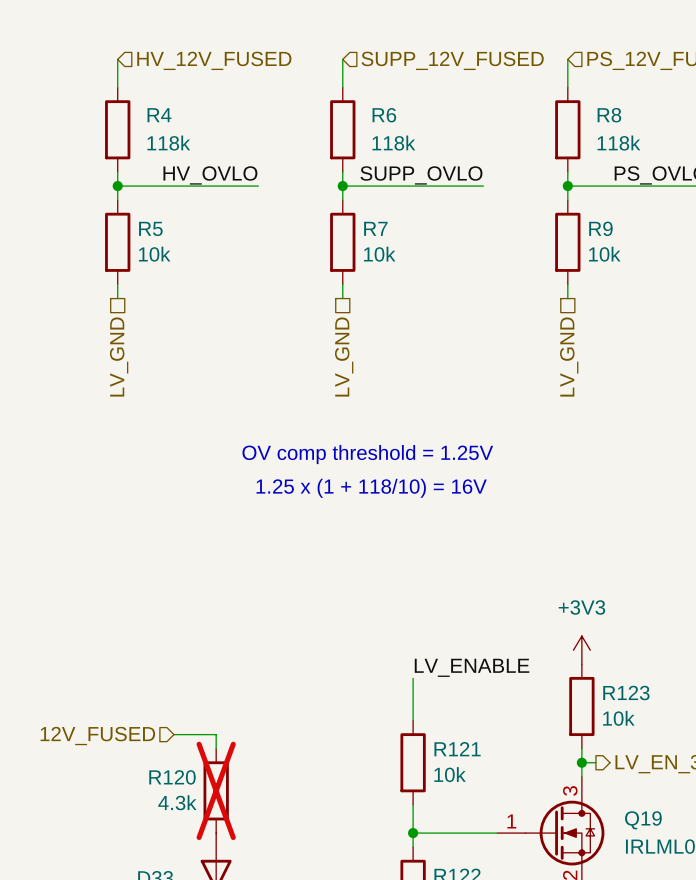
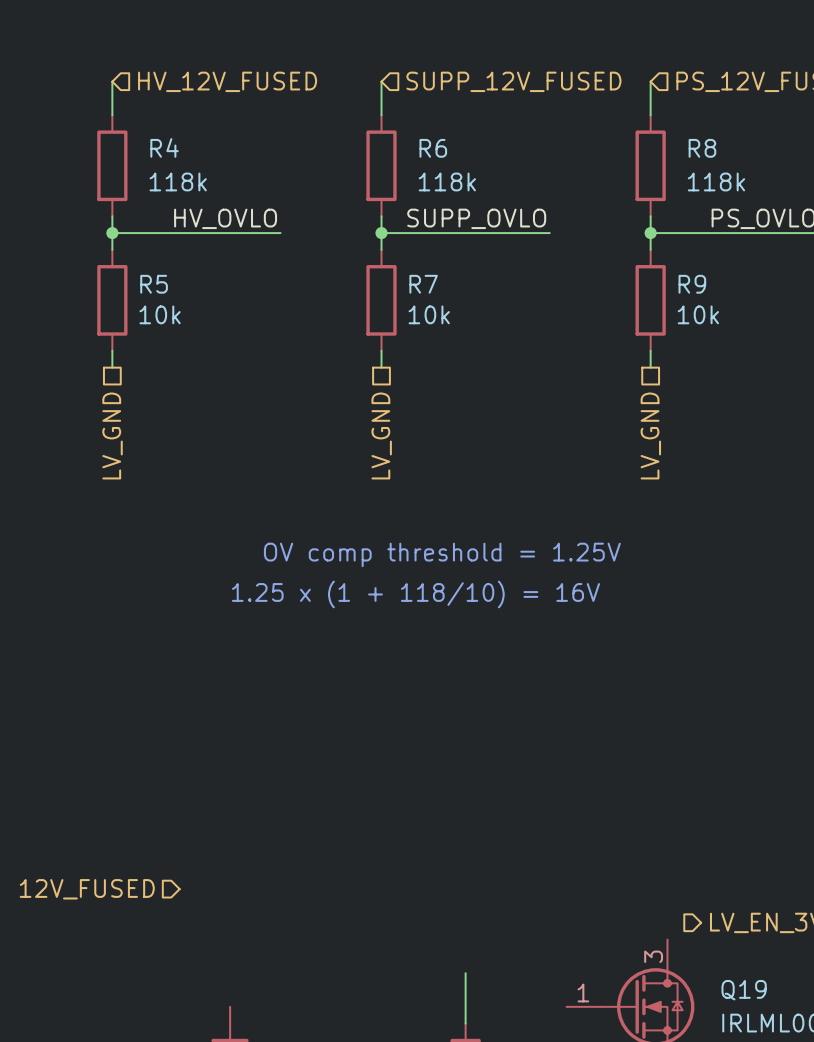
power symbol: +3V3 (581, 650) -> none
label: LV_ENABLE (472, 667) -> none
wire: (413, 678) (413, 720) -> none
R123: 10k (581, 706) -> none
wire: (173, 734) (216, 734) (216, 748) -> none
wire: (581, 748) (581, 776) -> none
R121: 10k (413, 762) -> none
wire: (581, 762) (595, 762) -> none
junction: (581, 762) -> none
R120: 4.3k (216, 790) -> none
wire: (413, 833) (497, 833) -> none
junction: (413, 833) -> none

